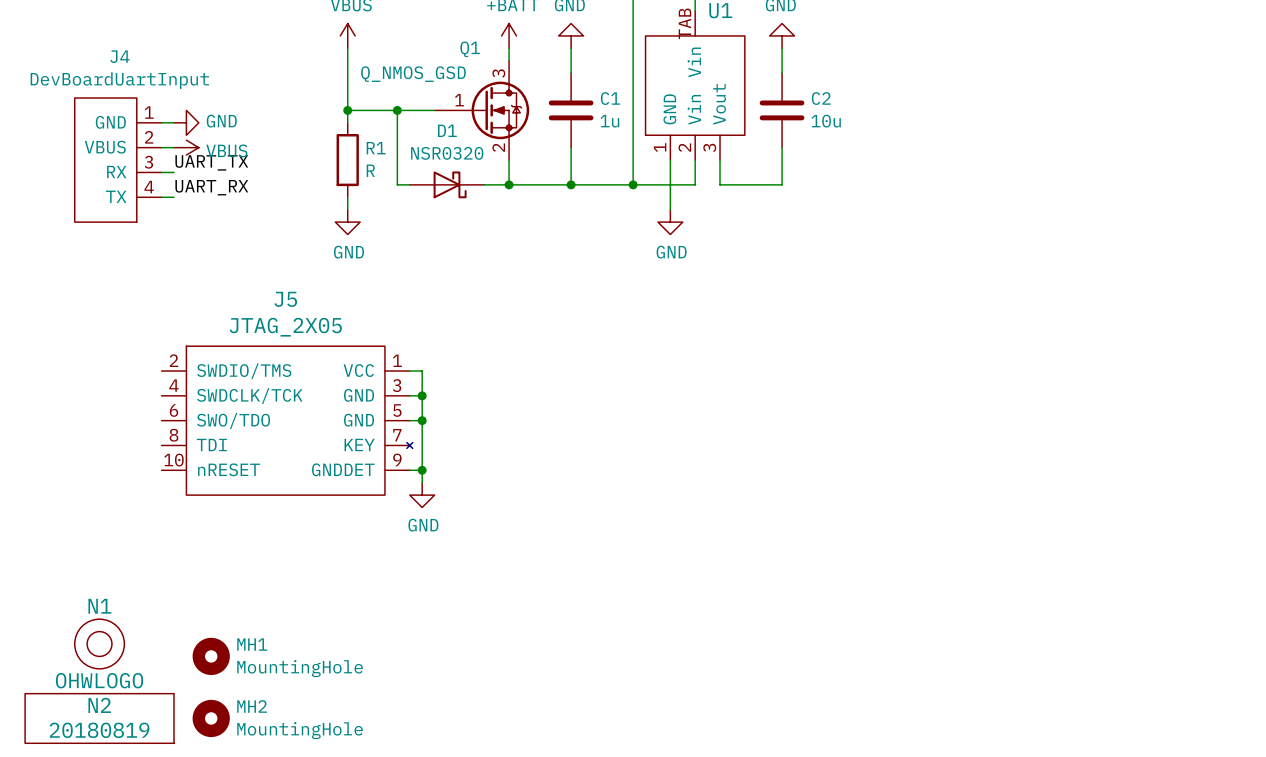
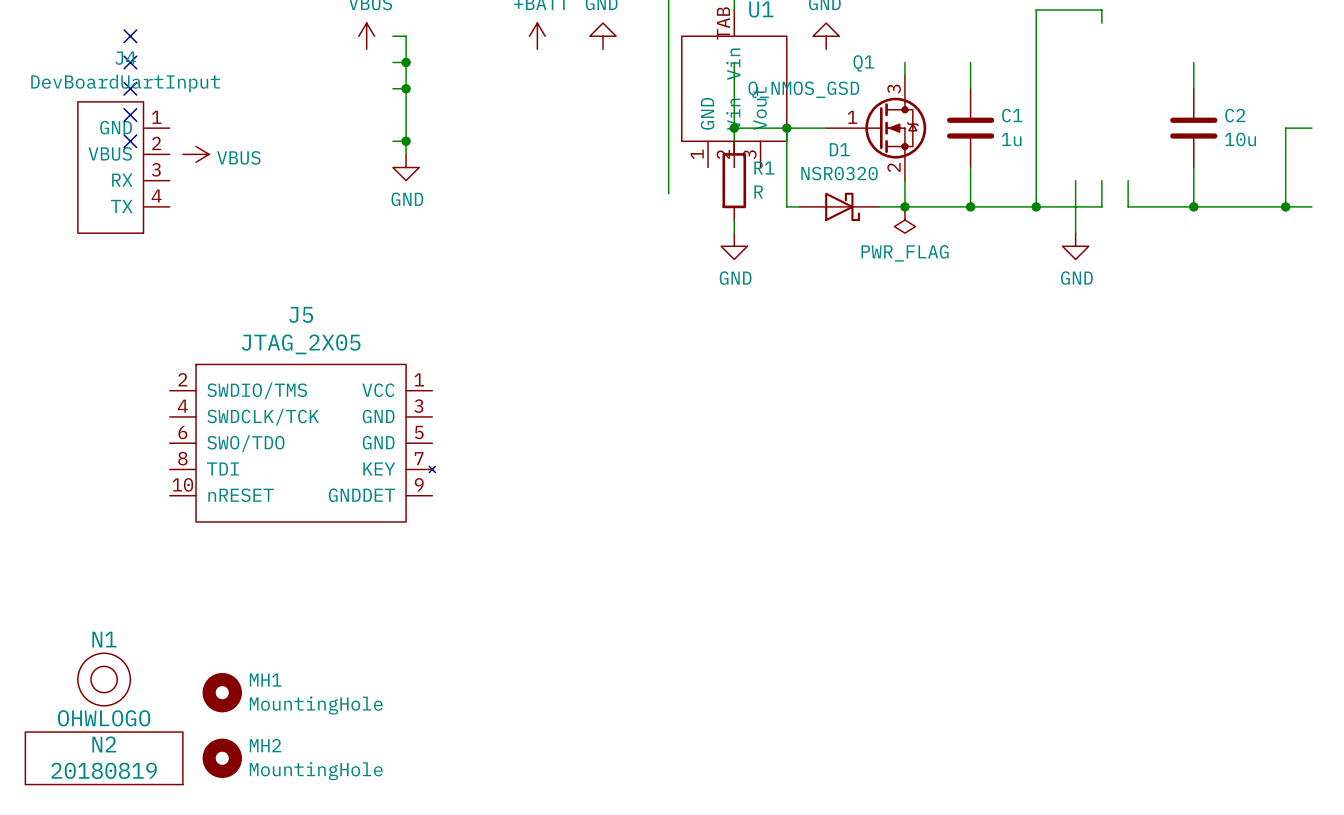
wire: none -> (1101, 23) (1101, 9) (1036, 9) (1036, 206)
no-connect mark: none -> (130, 36)
wire: none -> (392, 36) (406, 36) (406, 154)
wire: (347, 48) (347, 122) -> none
wire: (509, 48) (509, 60) -> none
wire: (571, 48) (571, 73) -> none
wire: (782, 48) (782, 73) -> (970, 62) (970, 88)
no-connect mark: none -> (130, 62)
junction: none -> (406, 62)
wire: none -> (734, 62) (734, 141)
wire: none -> (904, 62) (904, 75)
wire: none -> (1193, 62) (1193, 88)
no-connect mark: none -> (130, 88)
junction: none -> (406, 88)
no-connect mark: none -> (130, 115)
wire: (347, 110) (434, 110) -> none
junction: (347, 110) -> none
wire: (397, 110) (397, 184) (409, 184) -> none
junction: (397, 110) -> none
Q1 position: (481, 110) -> (876, 128)
C1 position: (571, 110) -> (970, 128)
C2 position: (782, 110) -> (1193, 128)
wire: (161, 122) (174, 122) -> (392, 62) (406, 62)
power symbol: GND (186, 122) -> none
wire: none -> (734, 128) (826, 128)
junction: none -> (734, 128)
wire: none -> (786, 128) (786, 206) (799, 206)
junction: none -> (786, 128)
wire: none -> (1311, 128) (1285, 128) (1285, 206)
no-connect mark: none -> (130, 141)
junction: none -> (406, 141)
wire: (161, 147) (174, 147) -> (392, 88) (406, 88)
wire: (571, 147) (571, 184) -> none
wire: (782, 147) (782, 184) (720, 184) (720, 160) -> none
R1 position: (347, 160) -> (734, 180)
wire: (509, 160) (509, 184) -> none
wire: (670, 160) (670, 209) -> none
wire: (695, 160) (695, 184) (484, 184) -> none
wire: none -> (970, 167) (970, 206)
wire: none -> (1193, 167) (1193, 206)
label: UART_TX (211, 162) -> none
wire: (161, 172) (174, 172) -> none
wire: none -> (904, 180) (904, 206)
wire: none -> (1075, 180) (1075, 233)
wire: none -> (1101, 180) (1101, 206) (878, 206)
wire: none -> (1128, 180) (1128, 206) (1311, 206)
D1 position: (447, 184) -> (839, 206)
junction: (509, 184) -> none
junction: (571, 184) -> none
junction: (633, 184) -> none
label: UART_RX (211, 187) -> none
wire: (161, 197) (174, 197) -> (392, 141) (406, 141)
wire: (347, 197) (347, 209) -> none
junction: none -> (904, 206)
junction: none -> (970, 206)
junction: none -> (1036, 206)
junction: none -> (1193, 206)
junction: none -> (1285, 206)
wire: none -> (734, 220) (734, 233)
power symbol: none -> PWR_FLAG (904, 220)
power symbol position: GND (347, 222) -> GND (406, 167)
power symbol position: GND (670, 222) -> GND (734, 246)
power symbol: none -> GND (1075, 246)
wire: (409, 371) (422, 371) (422, 482) -> none
wire: (409, 395) (422, 395) -> none
junction: (422, 395) -> none
wire: (409, 420) (422, 420) -> none
junction: (422, 420) -> none
wire: (409, 470) (422, 470) -> none
junction: (422, 470) -> none
power symbol: GND (422, 495) -> none

